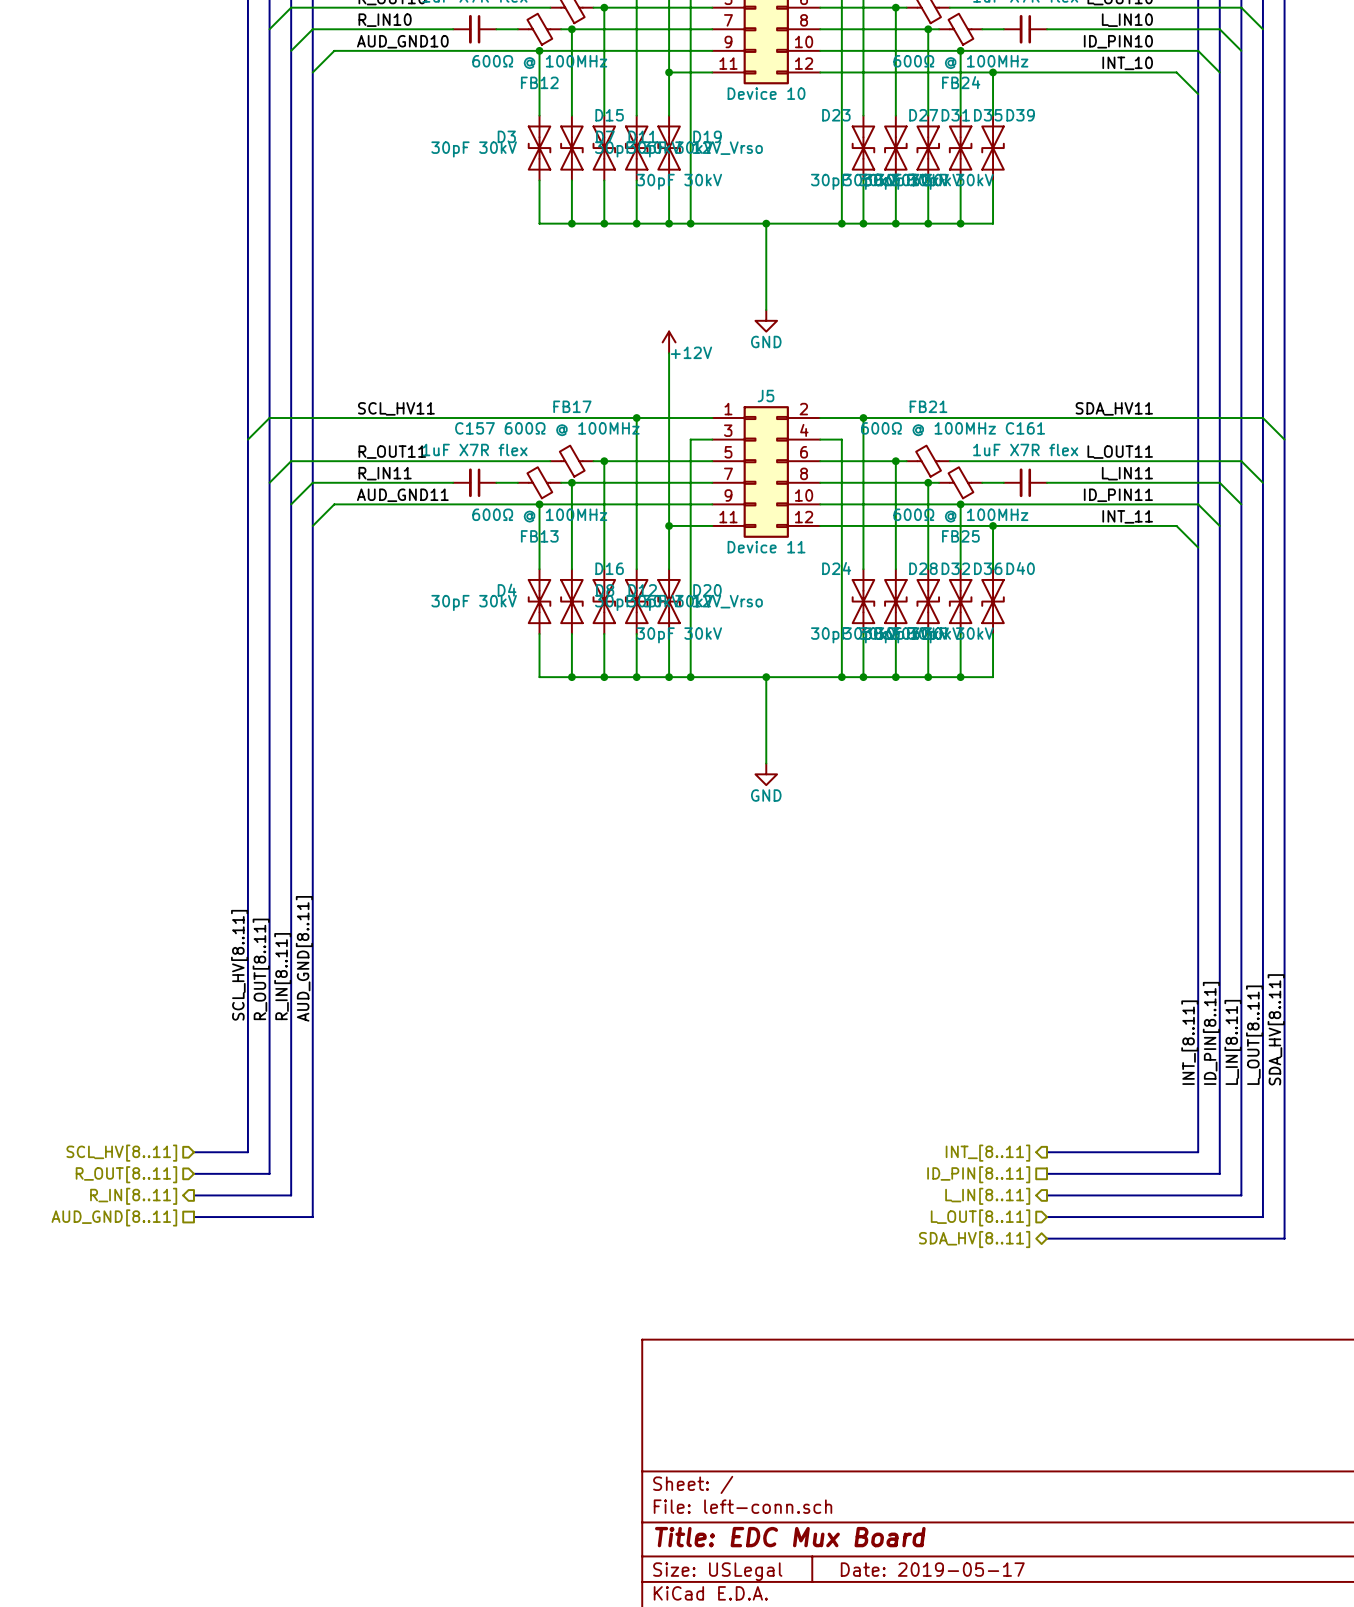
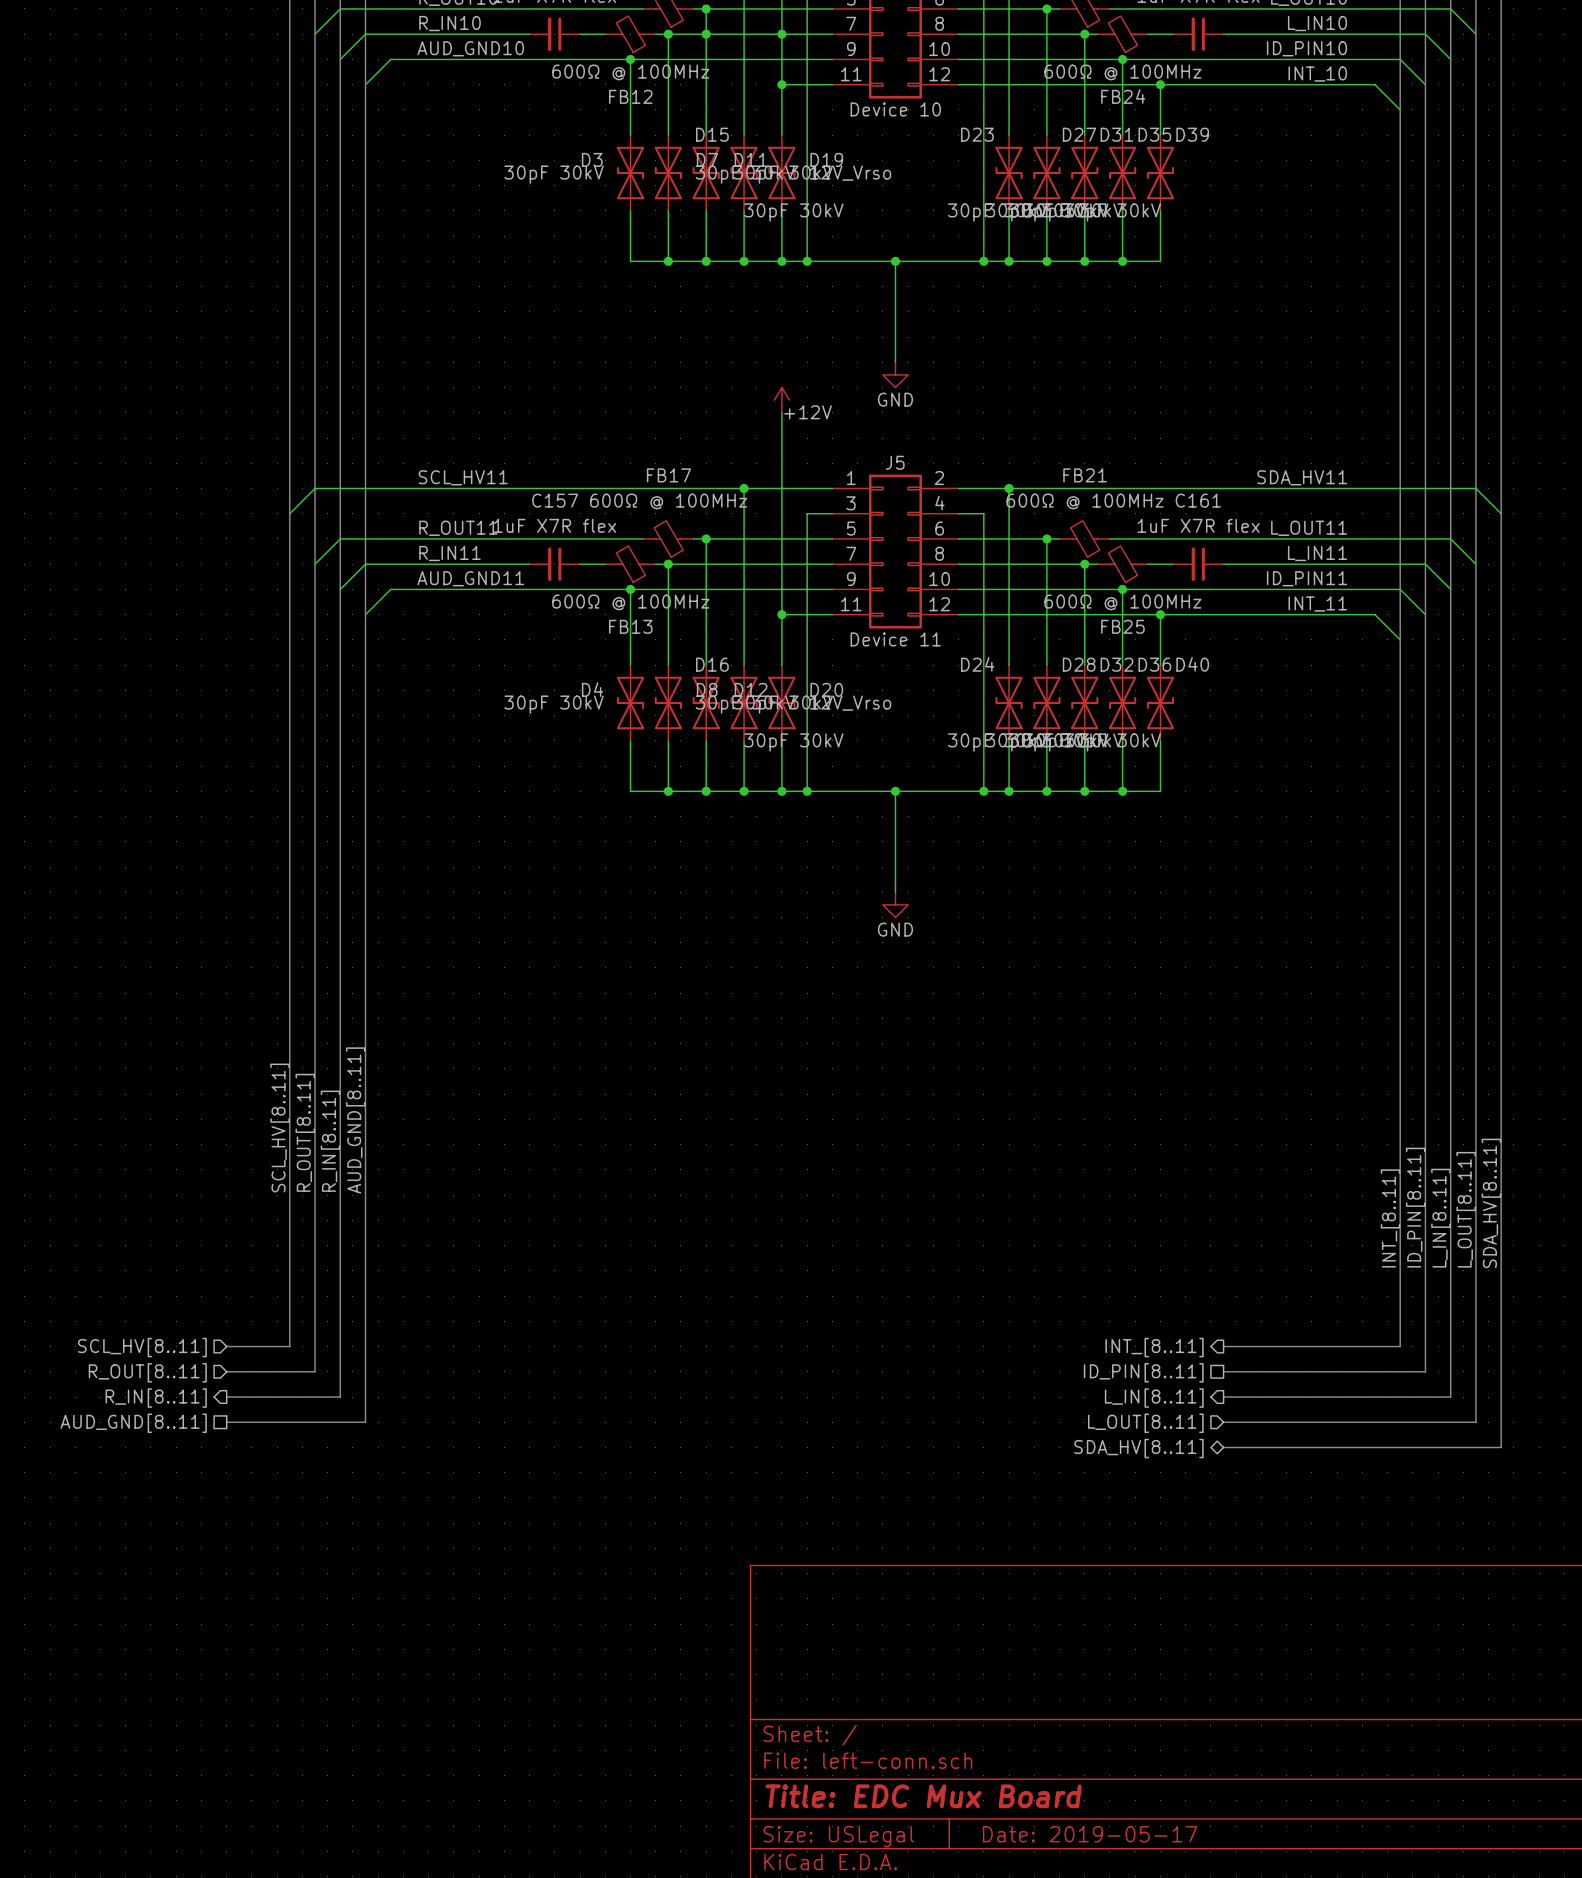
junction: none -> (706, 34)
junction: none -> (781, 34)

